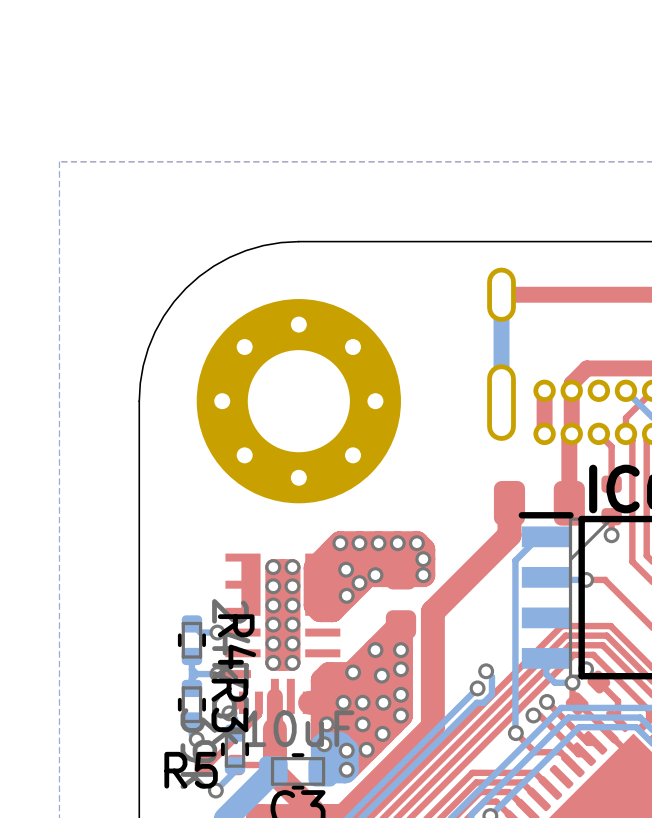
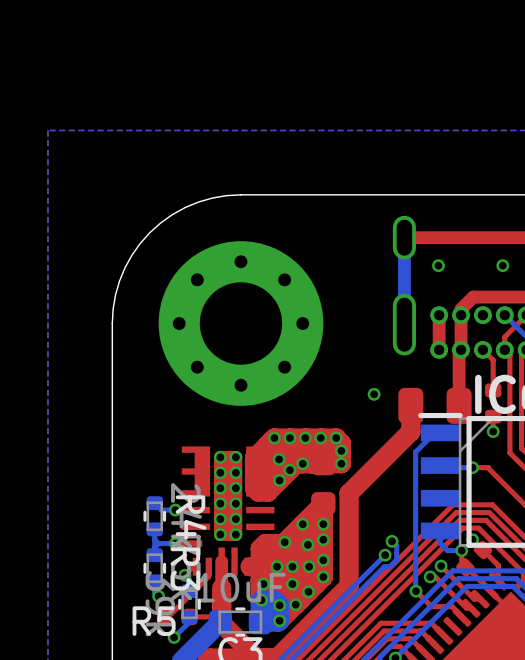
via: none -> (438, 265)
via: none -> (502, 265)
via: none -> (374, 394)

